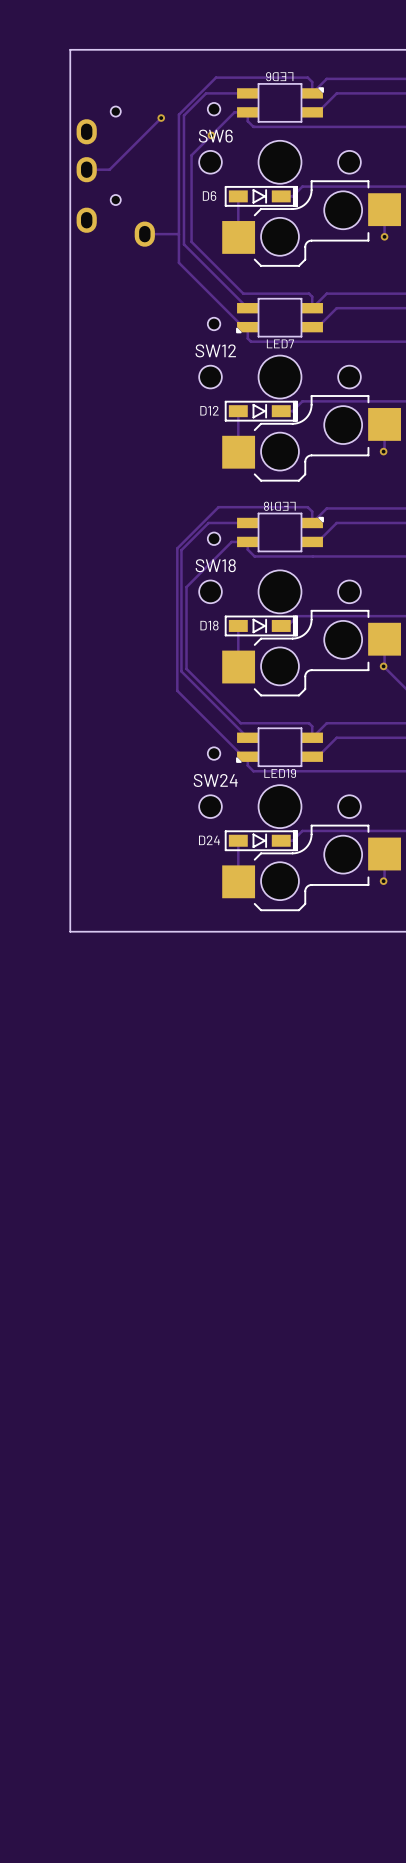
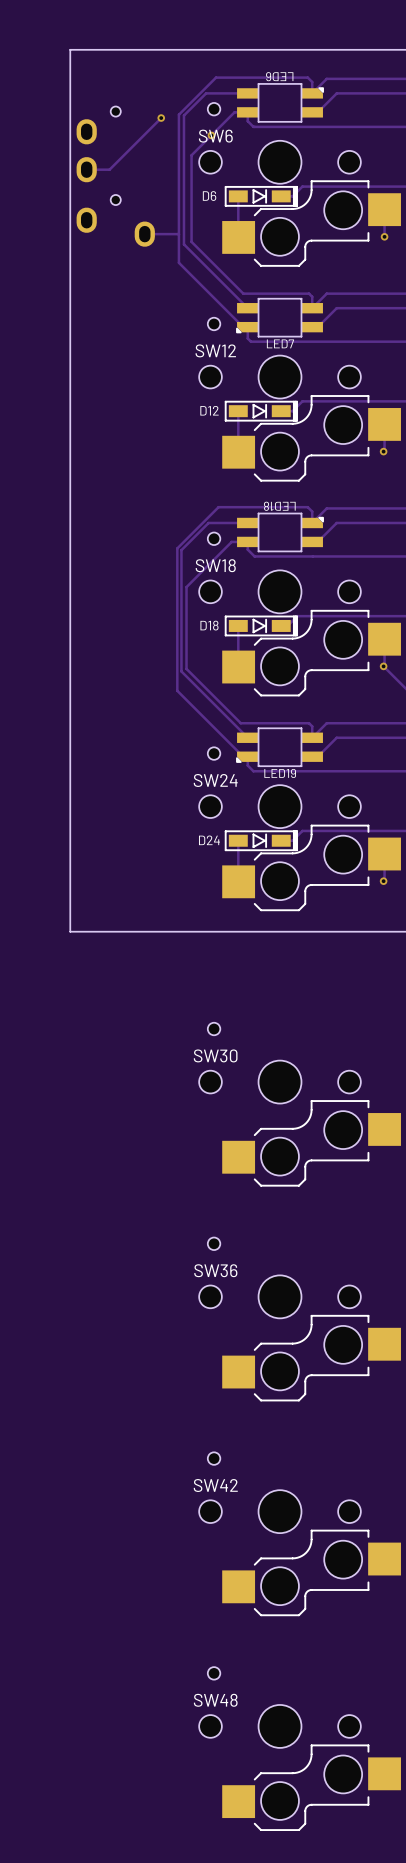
SW30: none -> (300, 1104)
SW36: none -> (300, 1319)
SW42: none -> (300, 1534)
SW48: none -> (300, 1749)

